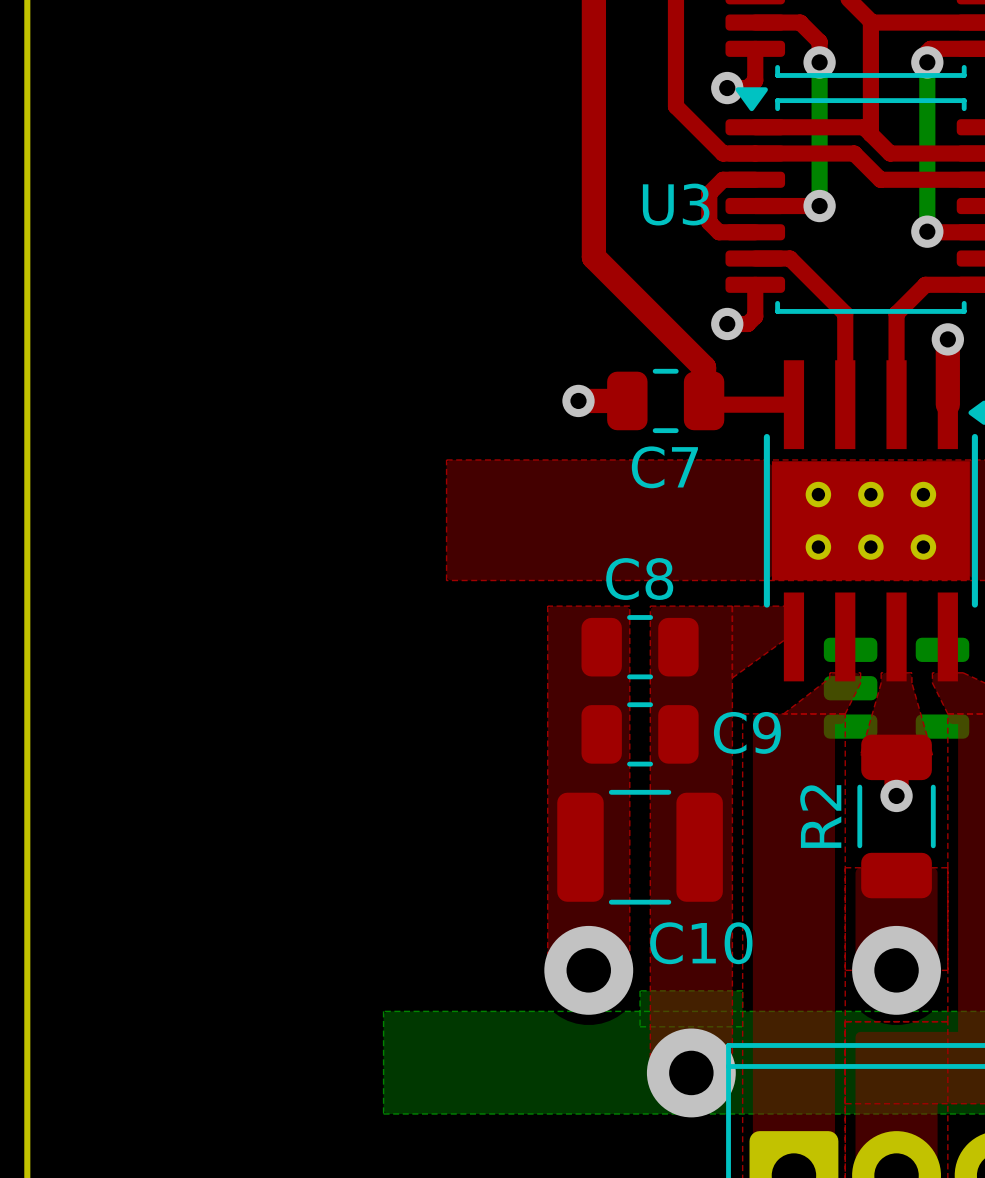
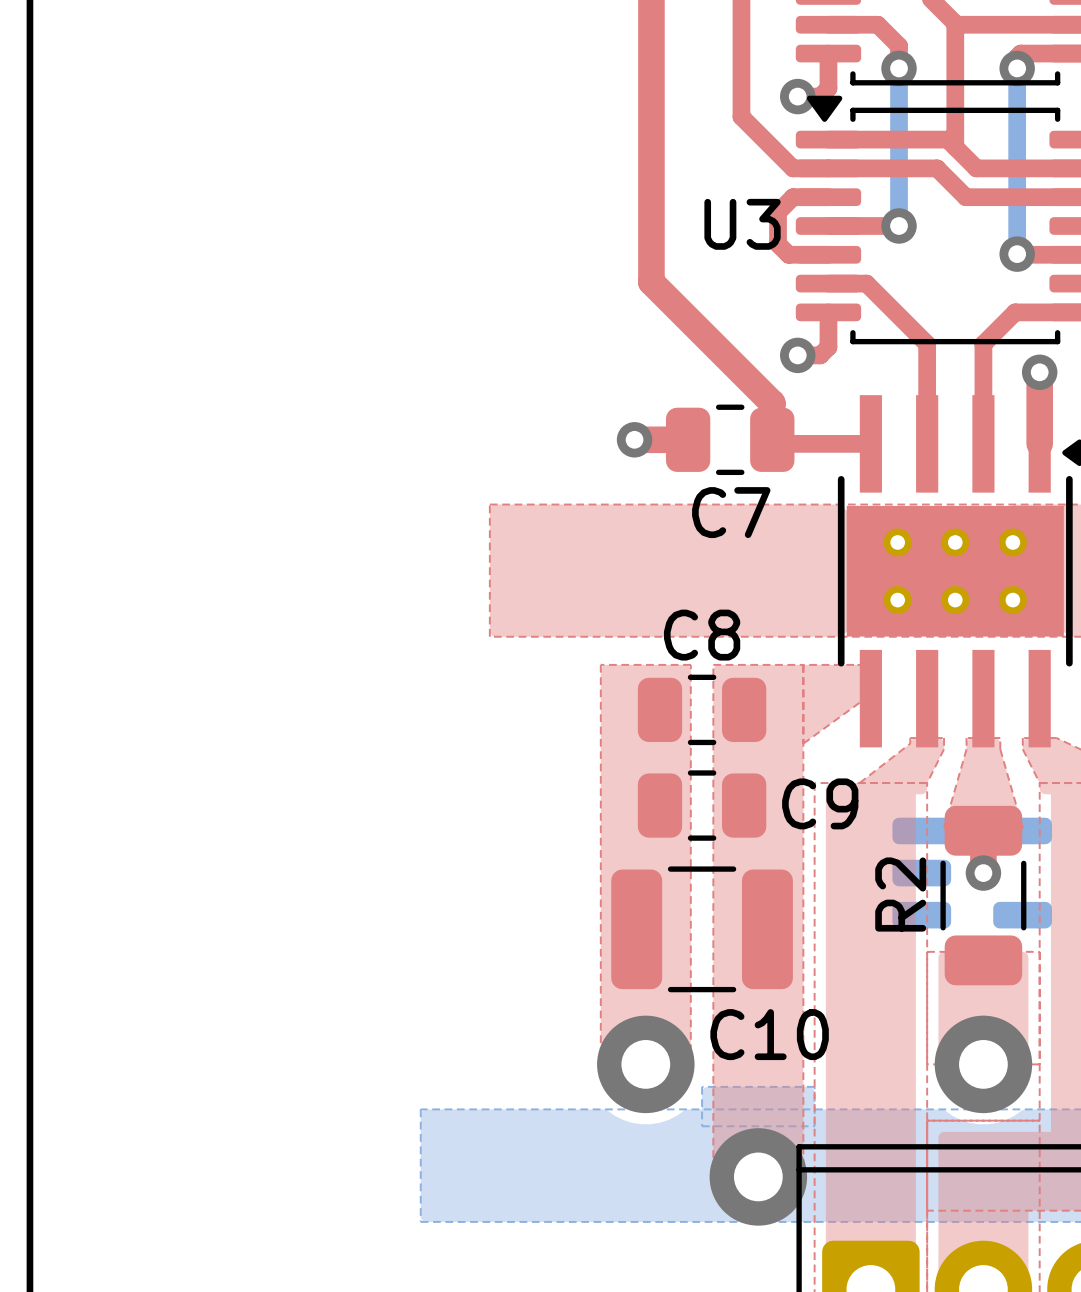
part position: (896, 688) -> (972, 873)

